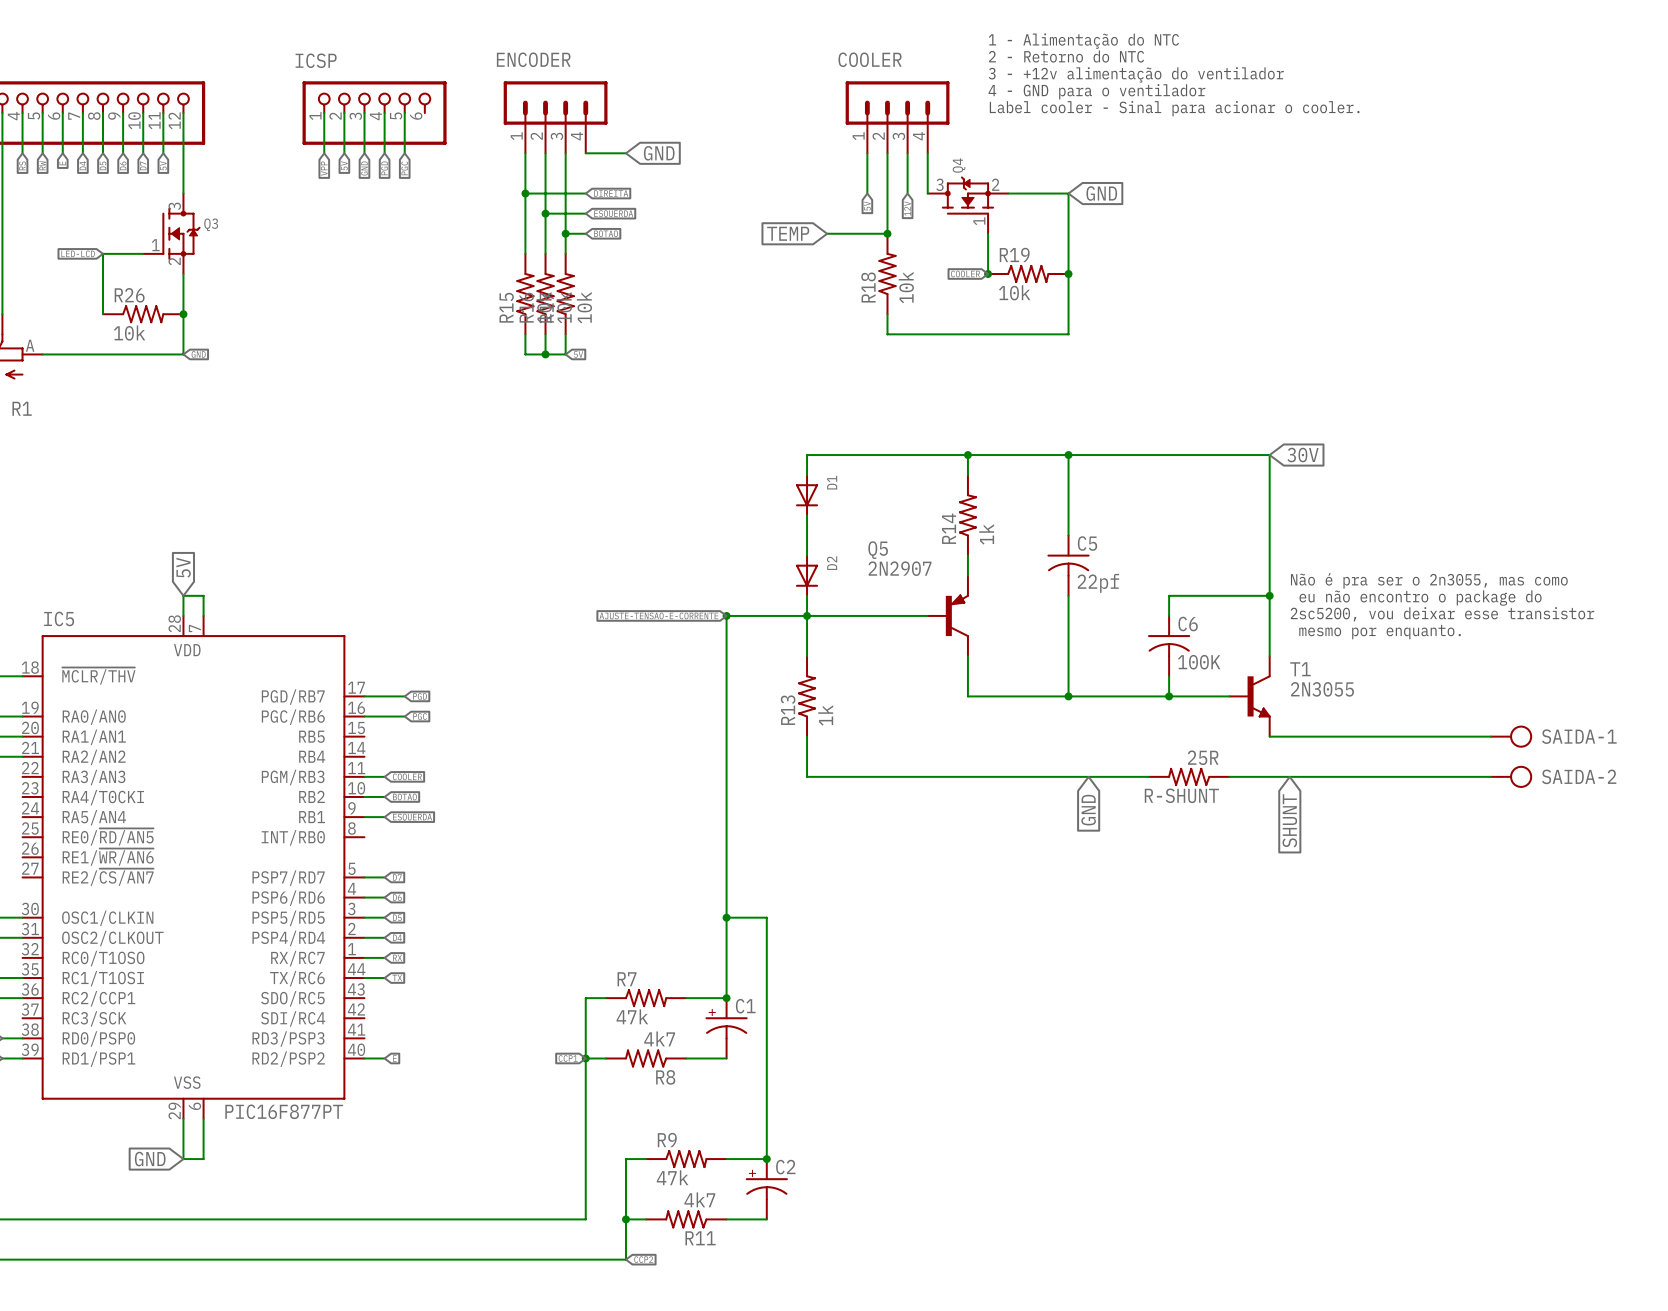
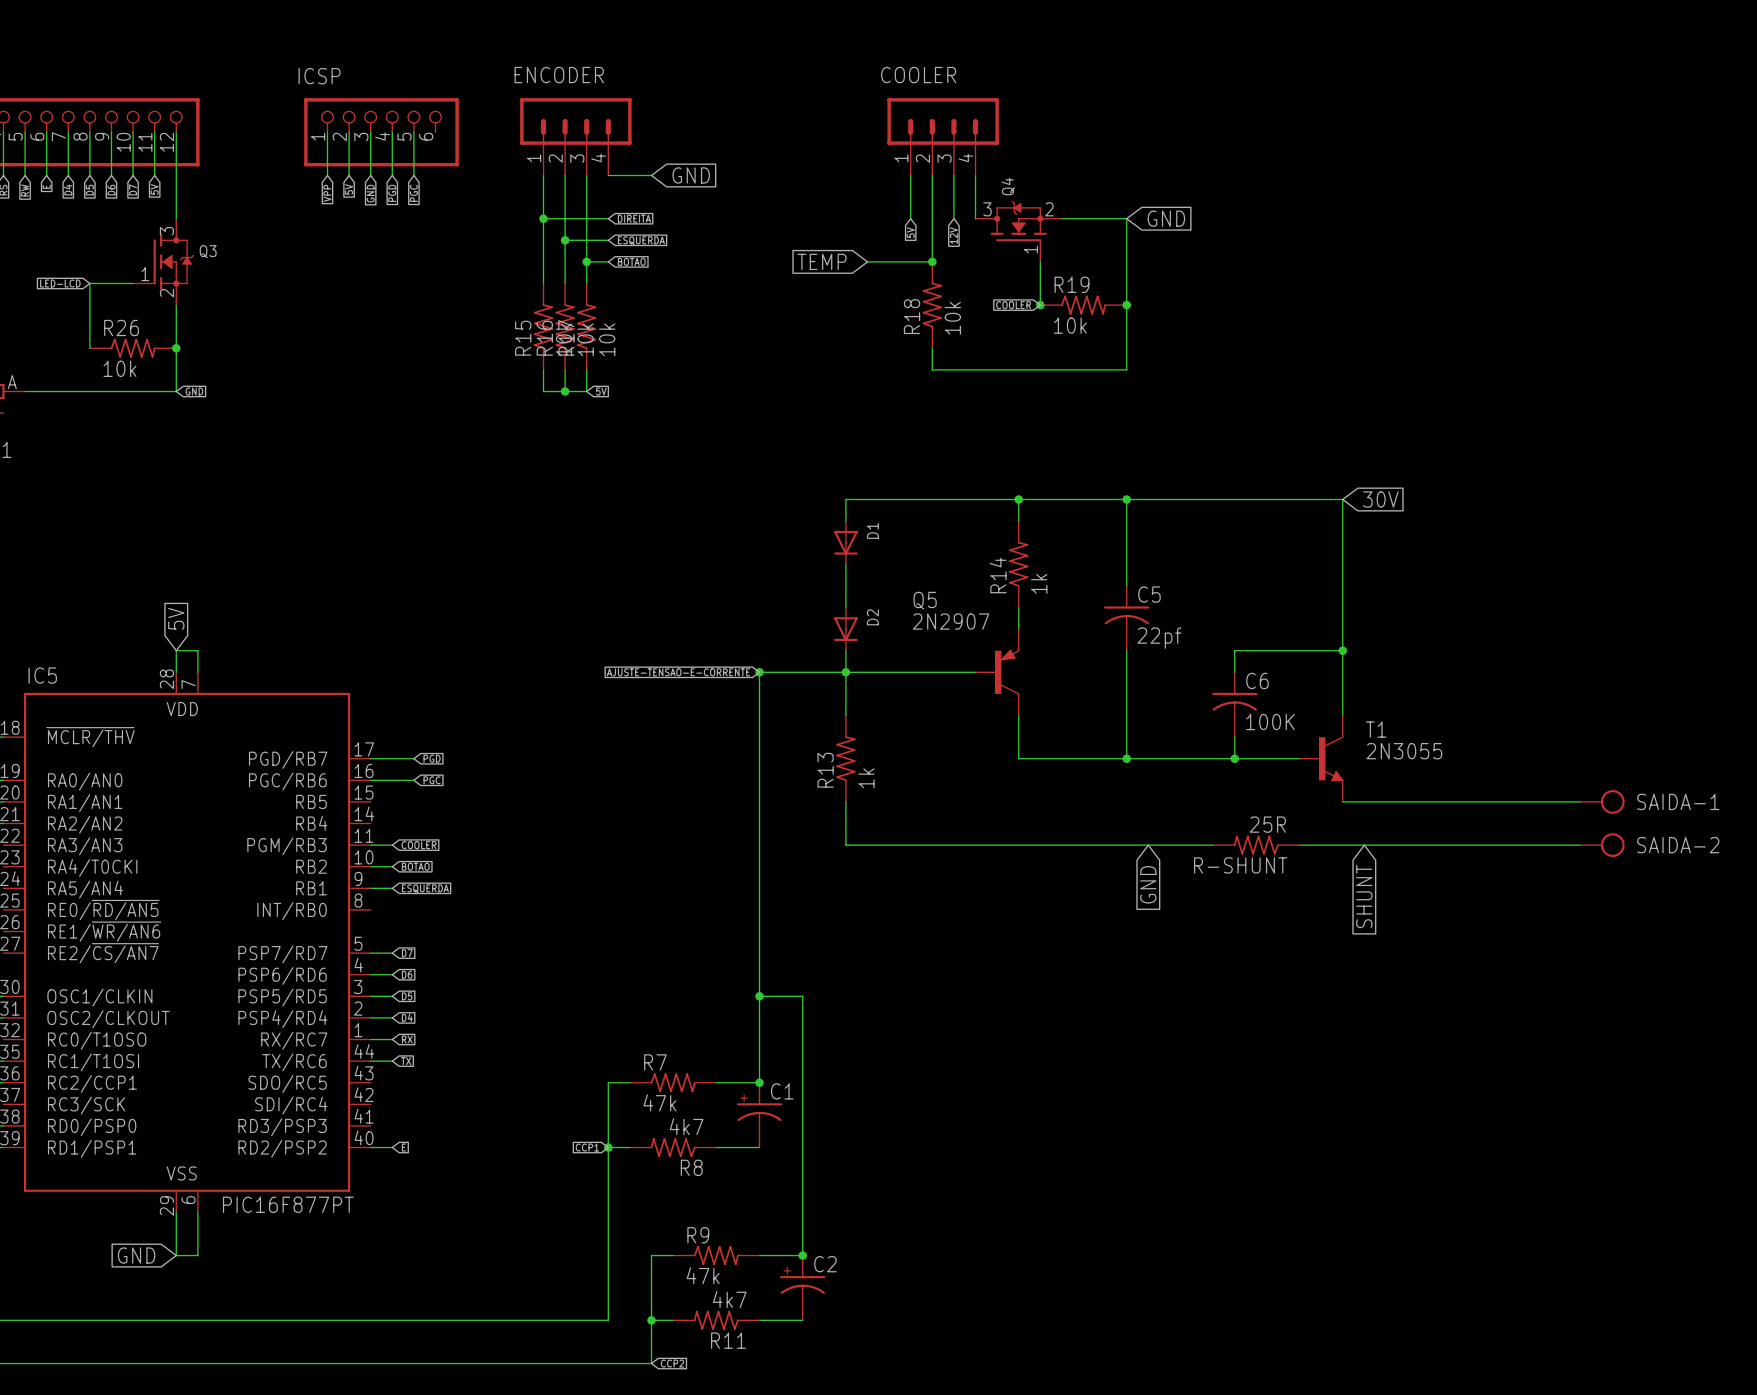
text: 1 - Alimentação do NTC (1083, 41) -> none
text: 2 - Retorno do NTC (1066, 56) -> none
text: 3 - +12v alimentação do ventilador (1136, 74) -> none
text: 4 - GND para o ventilador (1096, 91) -> none
text: Label cooler - Sinal para acionar o cooler. (1174, 108) -> none
text: Não é pra ser o 2n3055, mas como (1429, 580) -> none
text: eu não encontro o package do (1420, 598) -> none
text: 2sc5200, vou deixar esse transistor (1442, 614) -> none
text: mesmo por enquanto. (1380, 632) -> none

